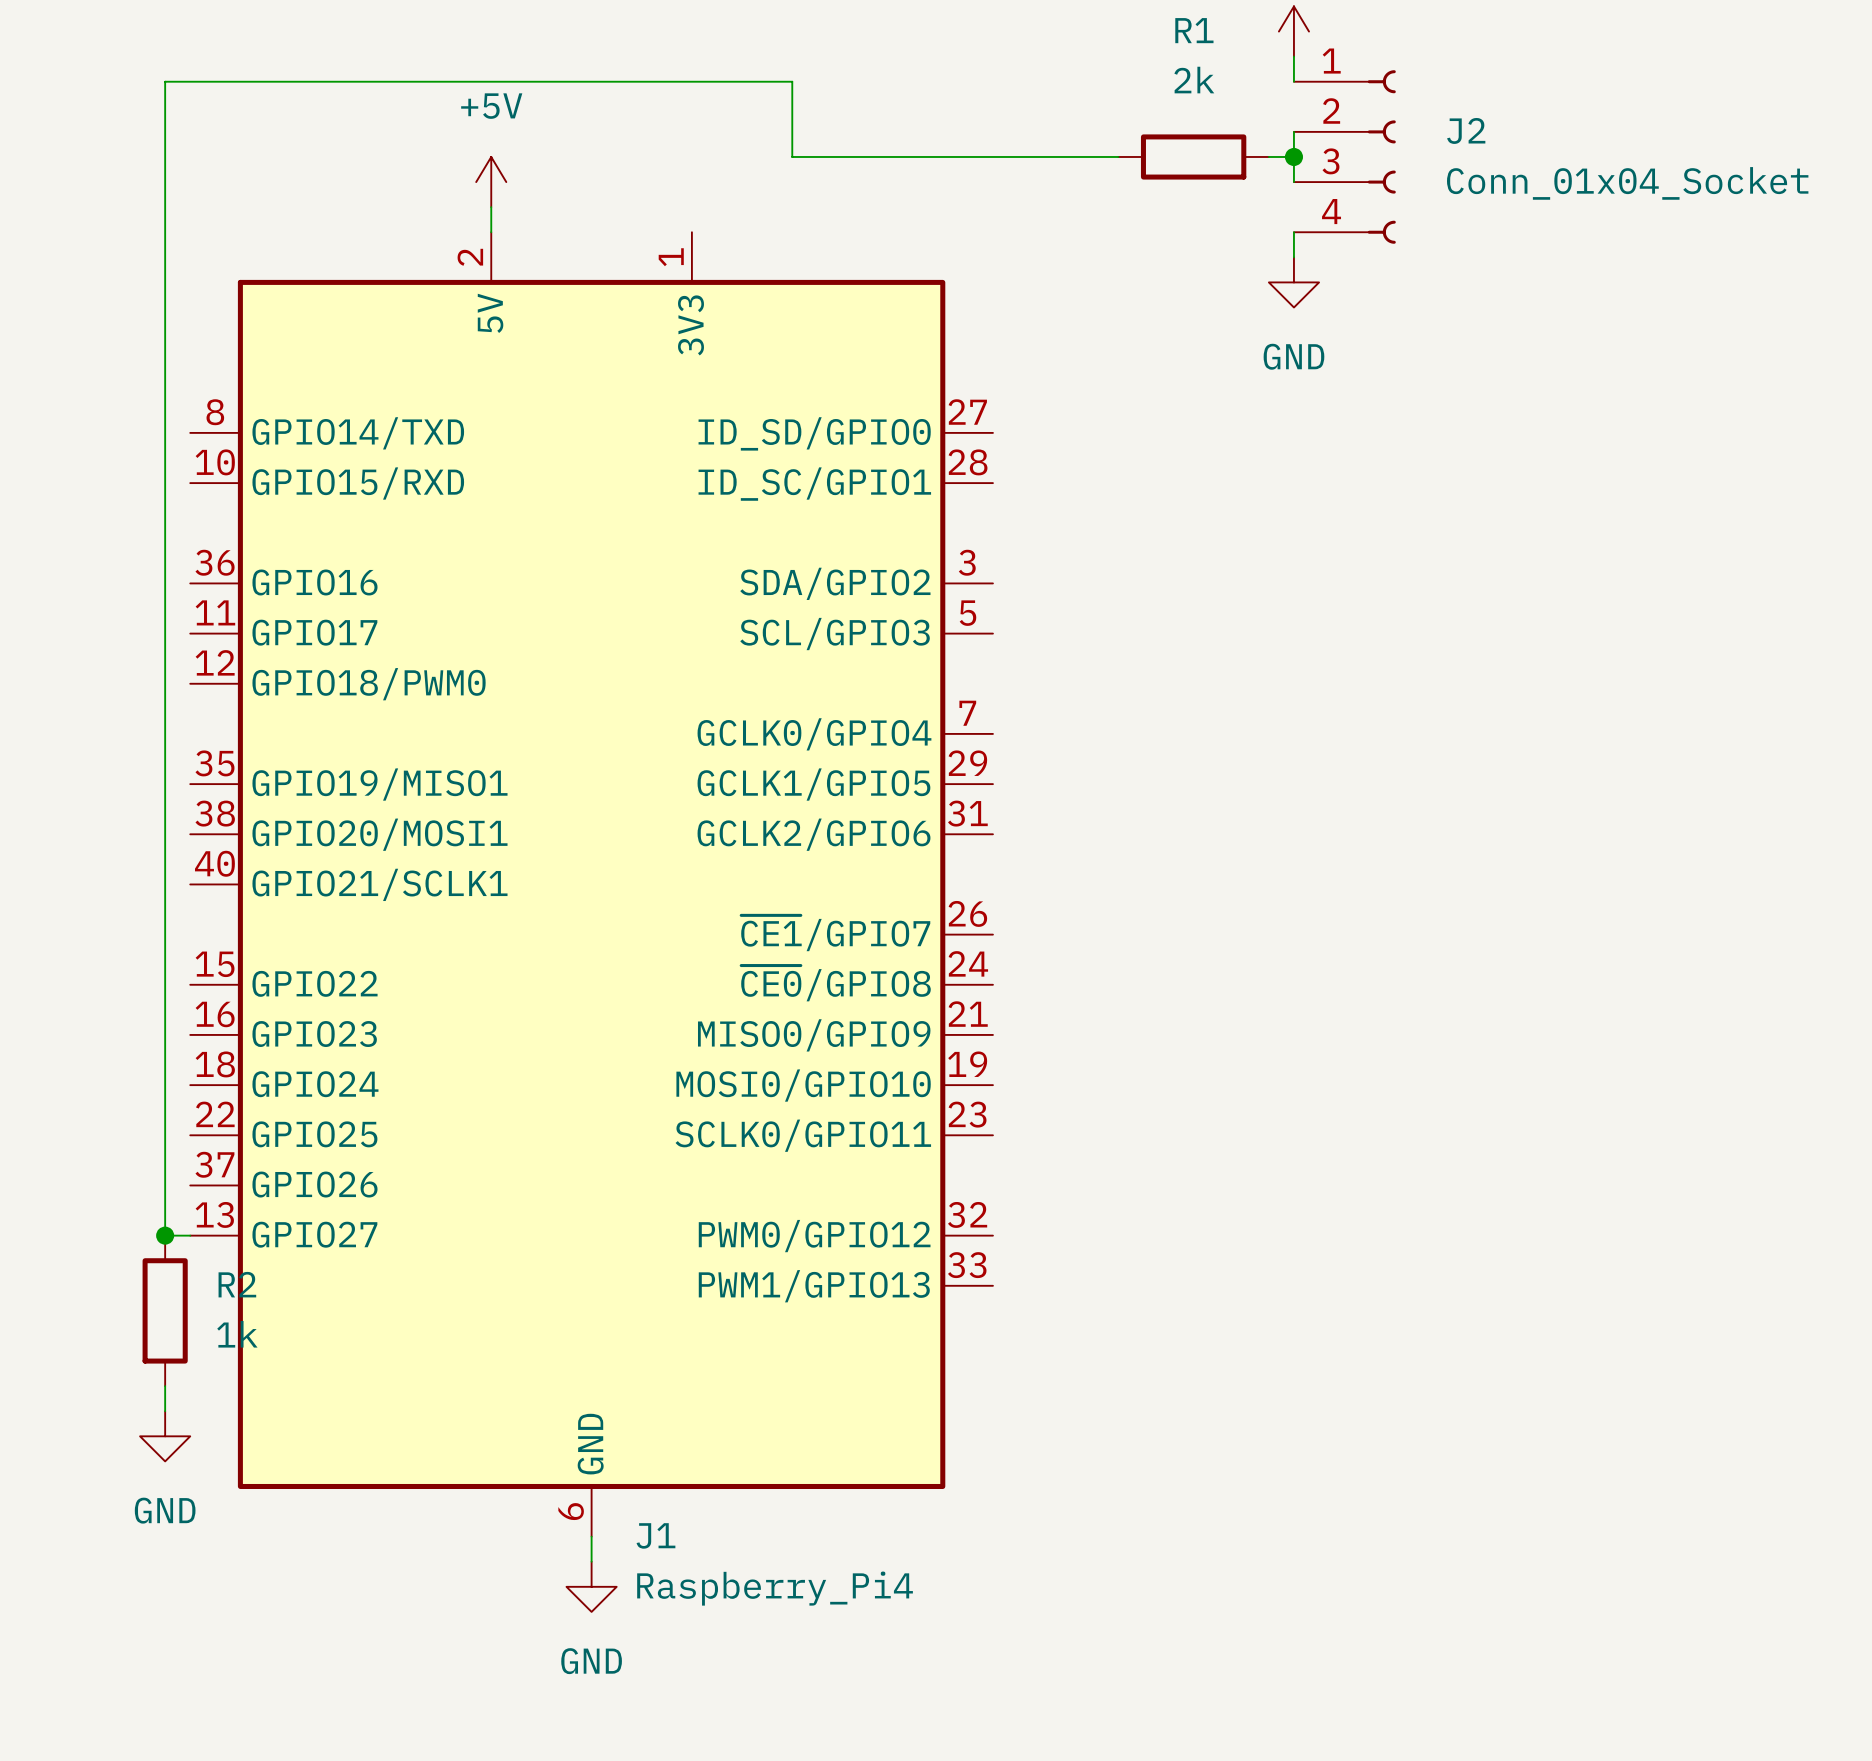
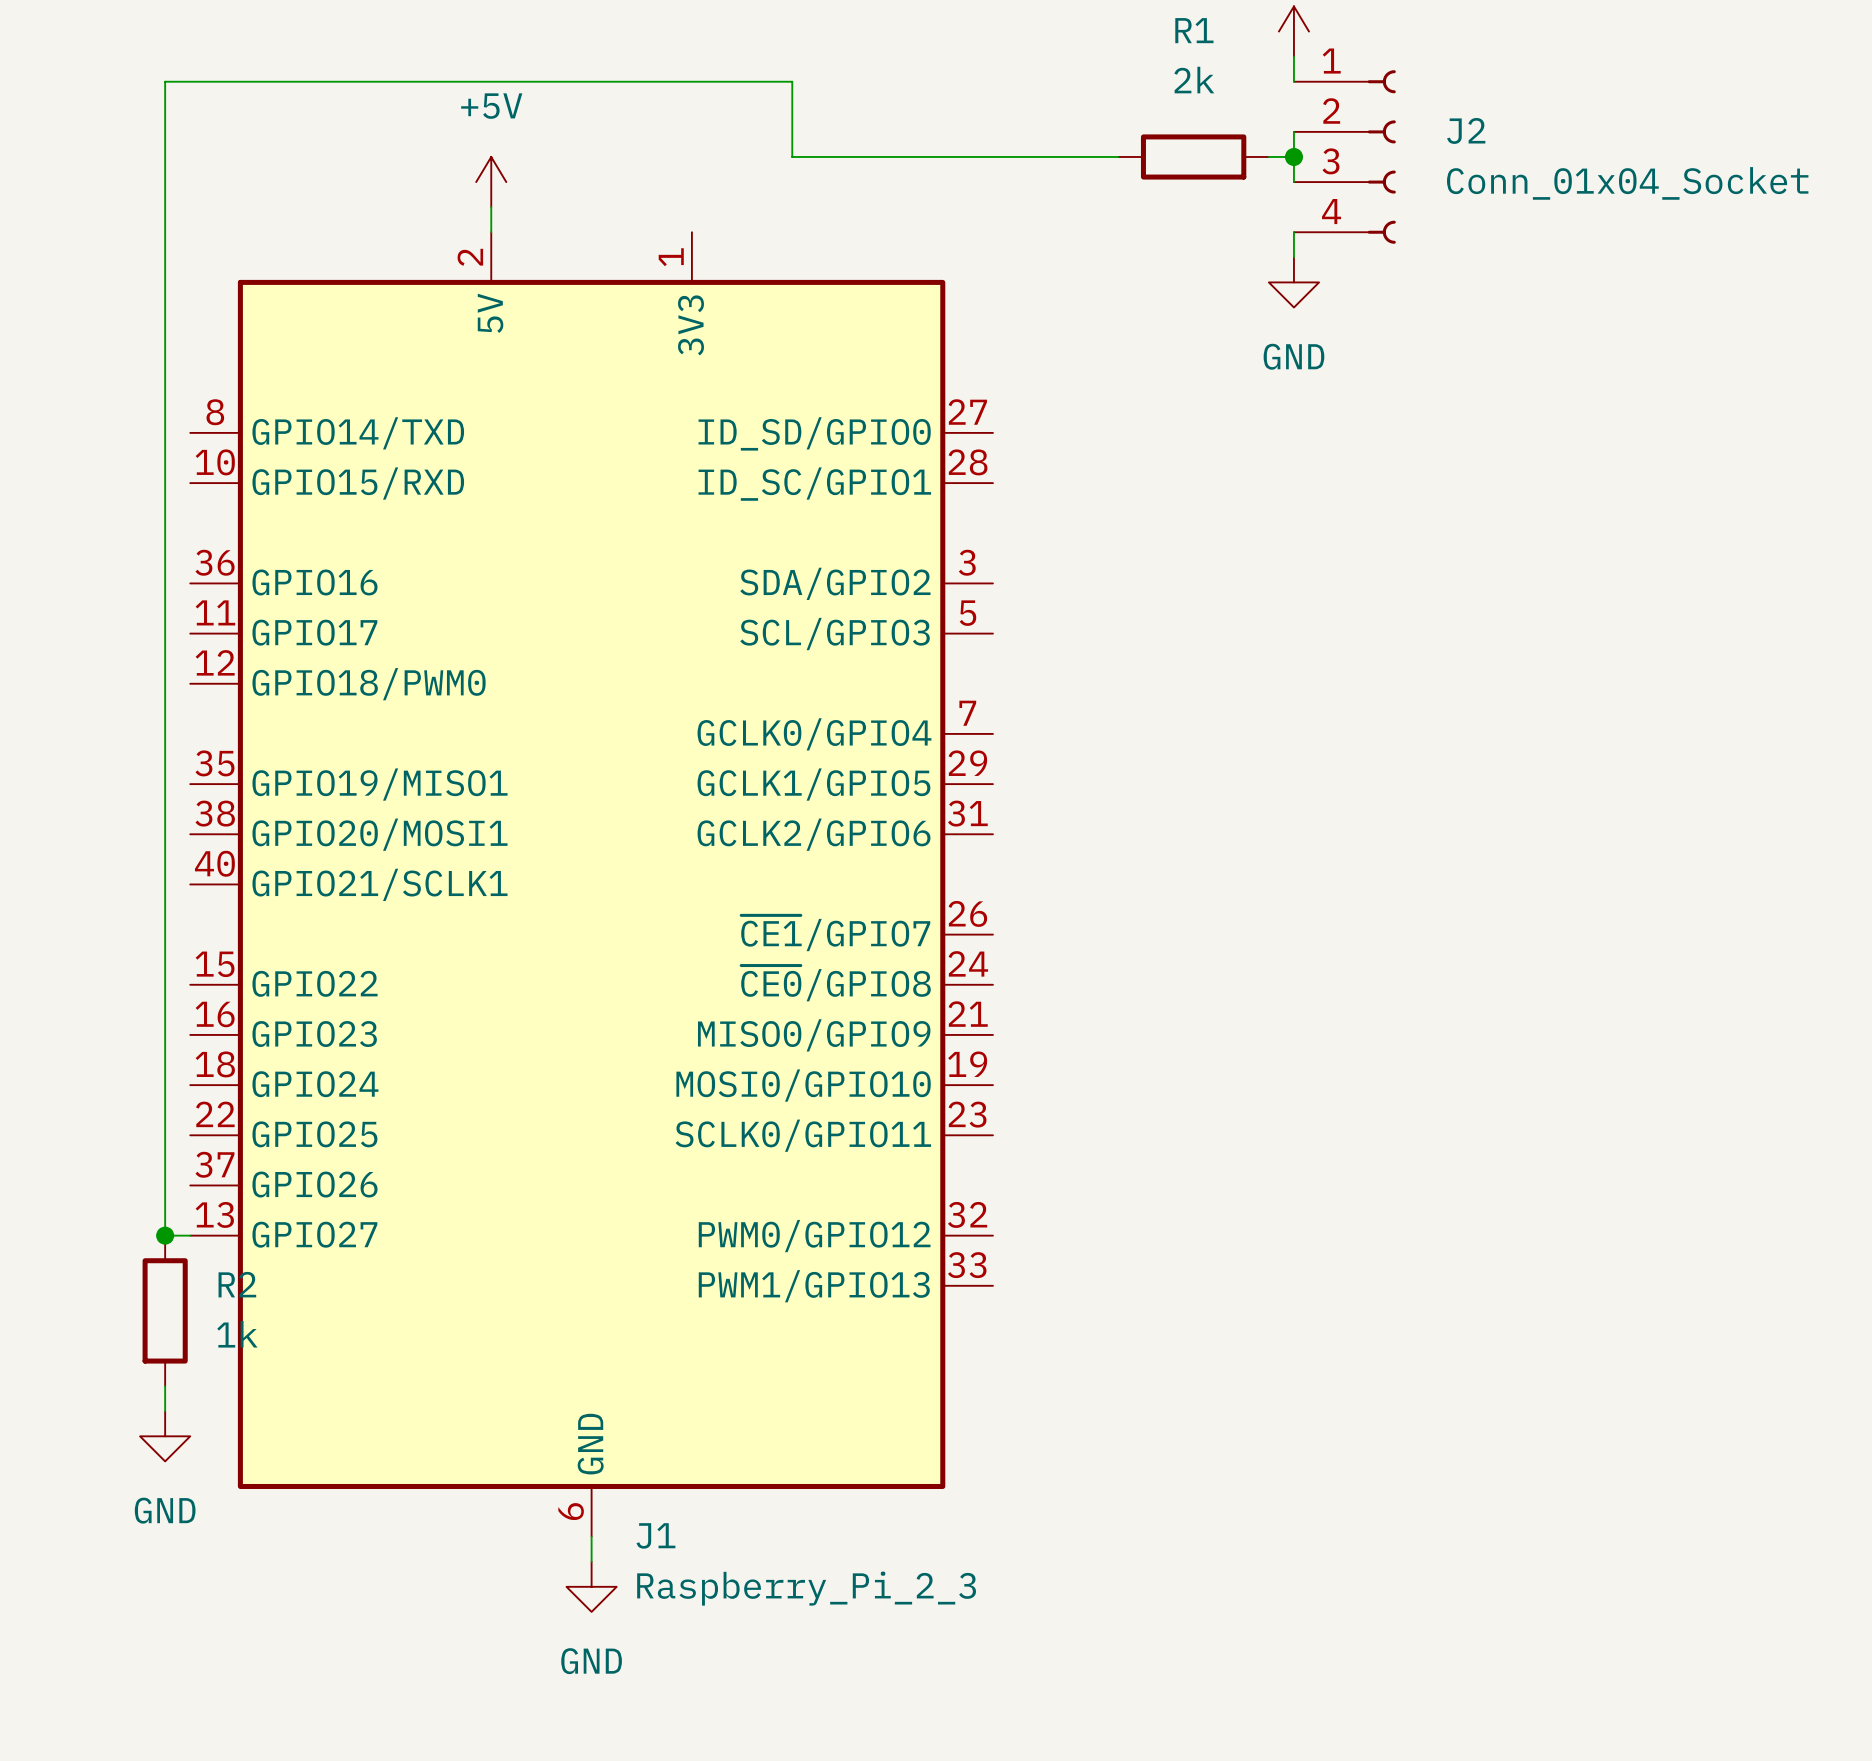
J1 value: Raspberry_Pi4 (775, 1588) -> Raspberry_Pi_2_3 (806, 1588)

